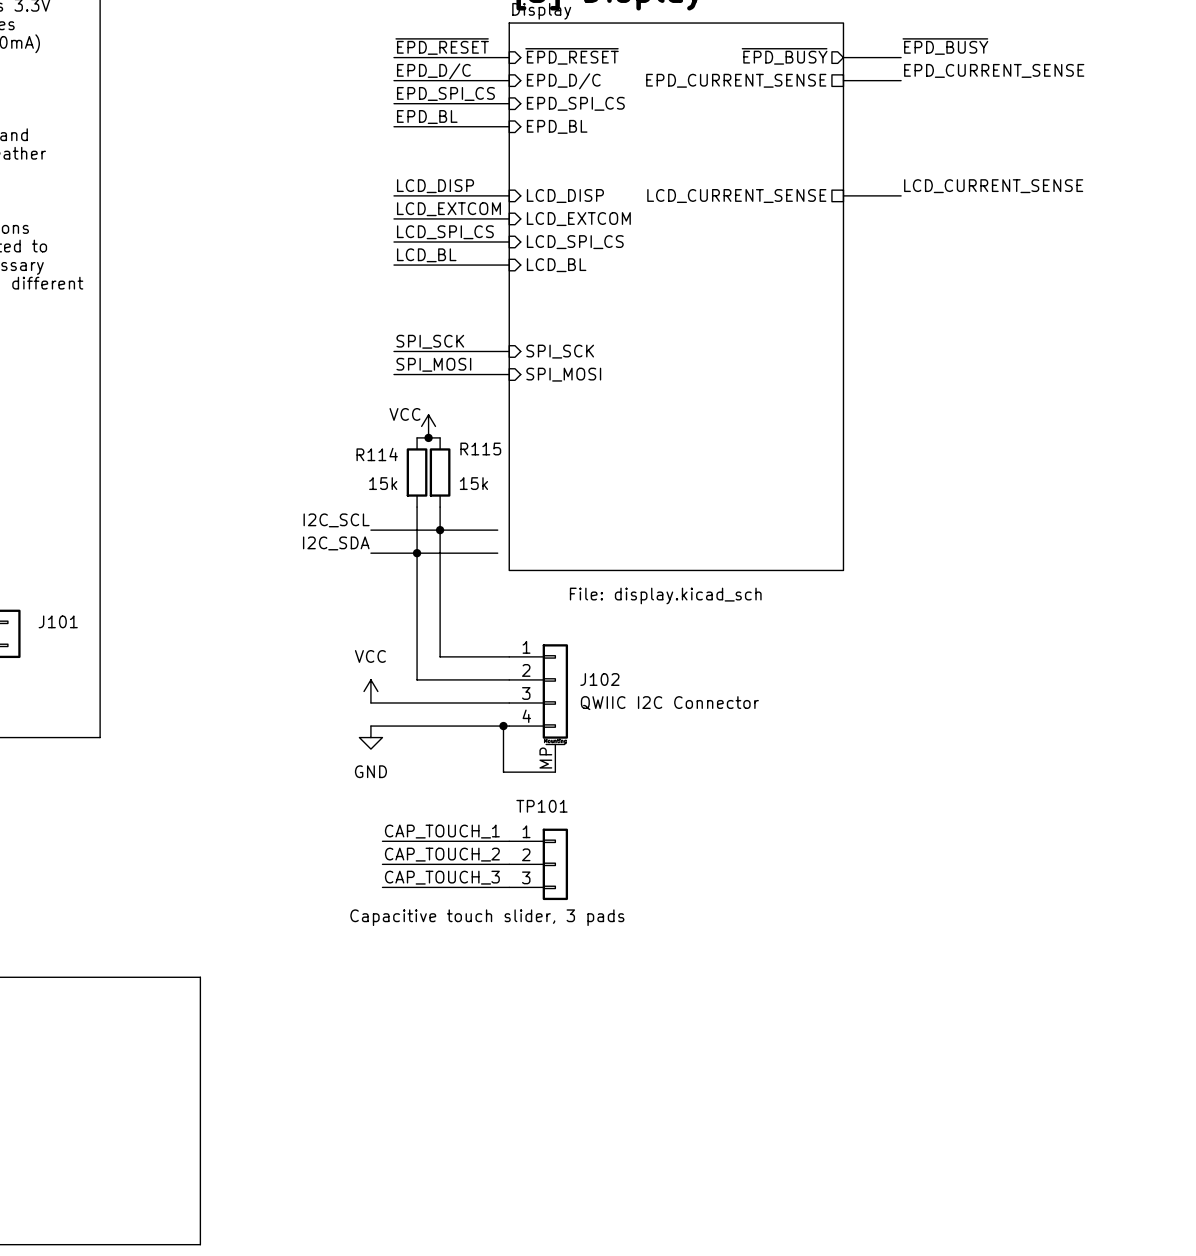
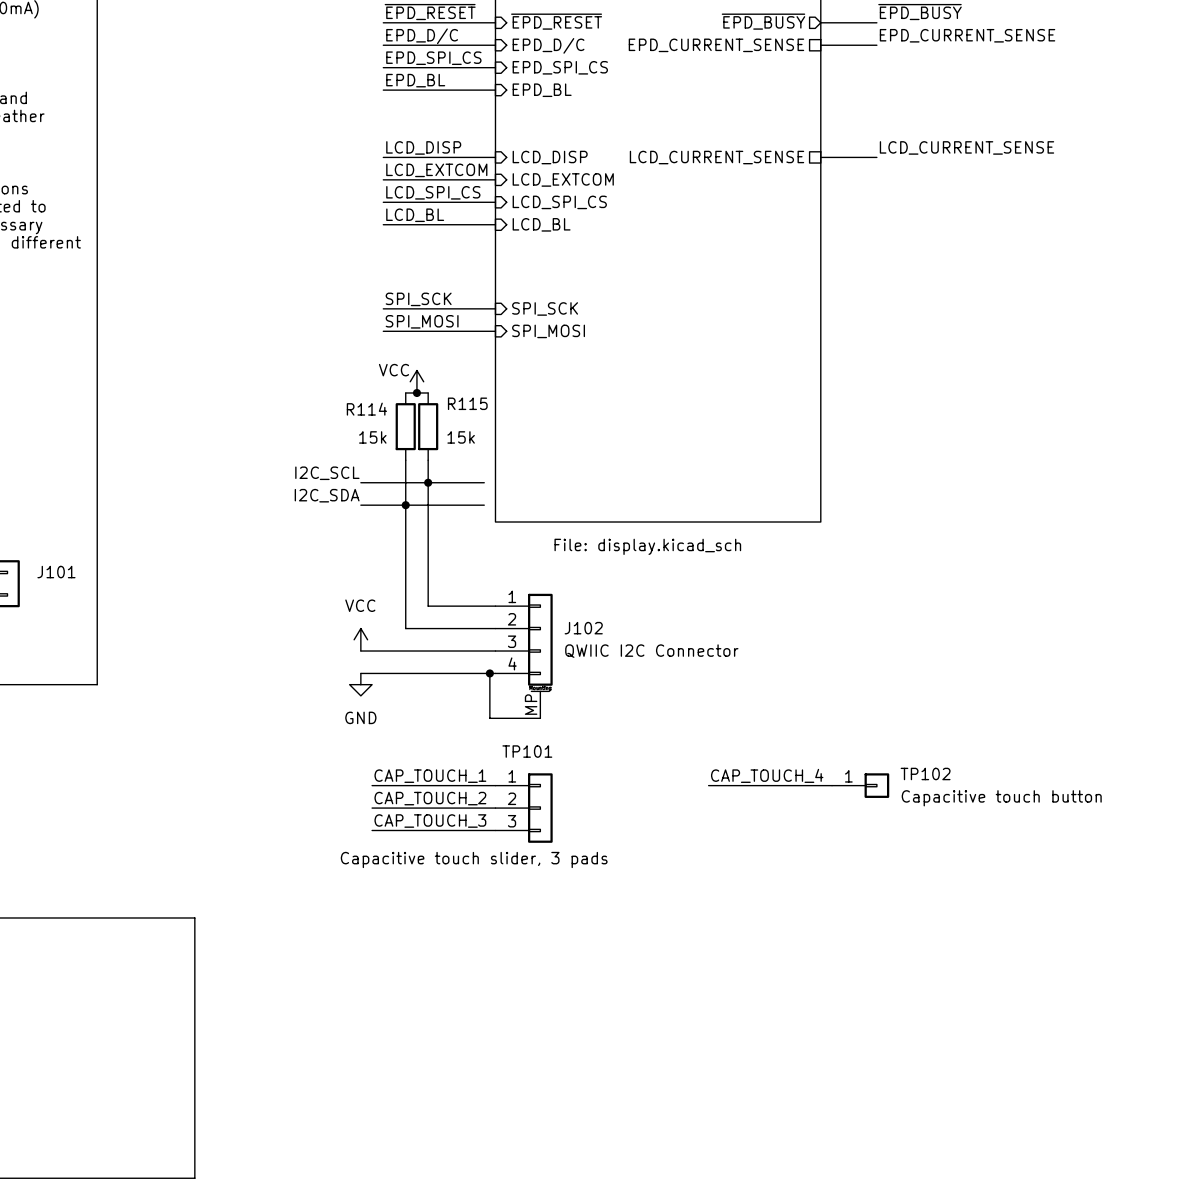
label: none -> CAP_TOUCH_4 (767, 775)
wire: none -> (708, 785) (832, 785)
TP102: none -> Capacitive touch button (860, 785)

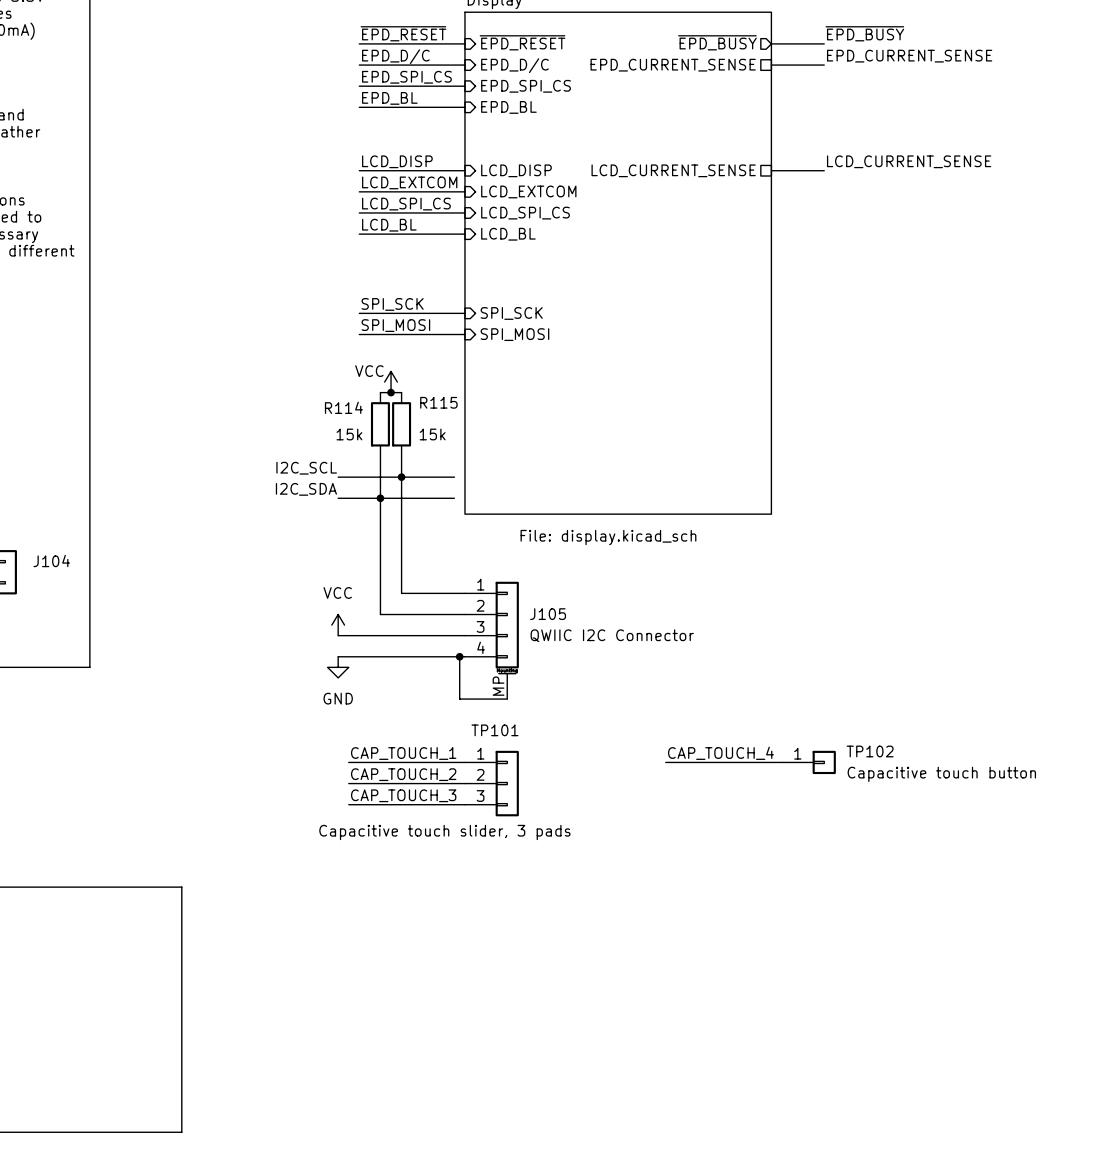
J101 name: J101 (56, 572) -> J104 (51, 561)
J102 name: J102 (583, 628) -> J105 (548, 614)

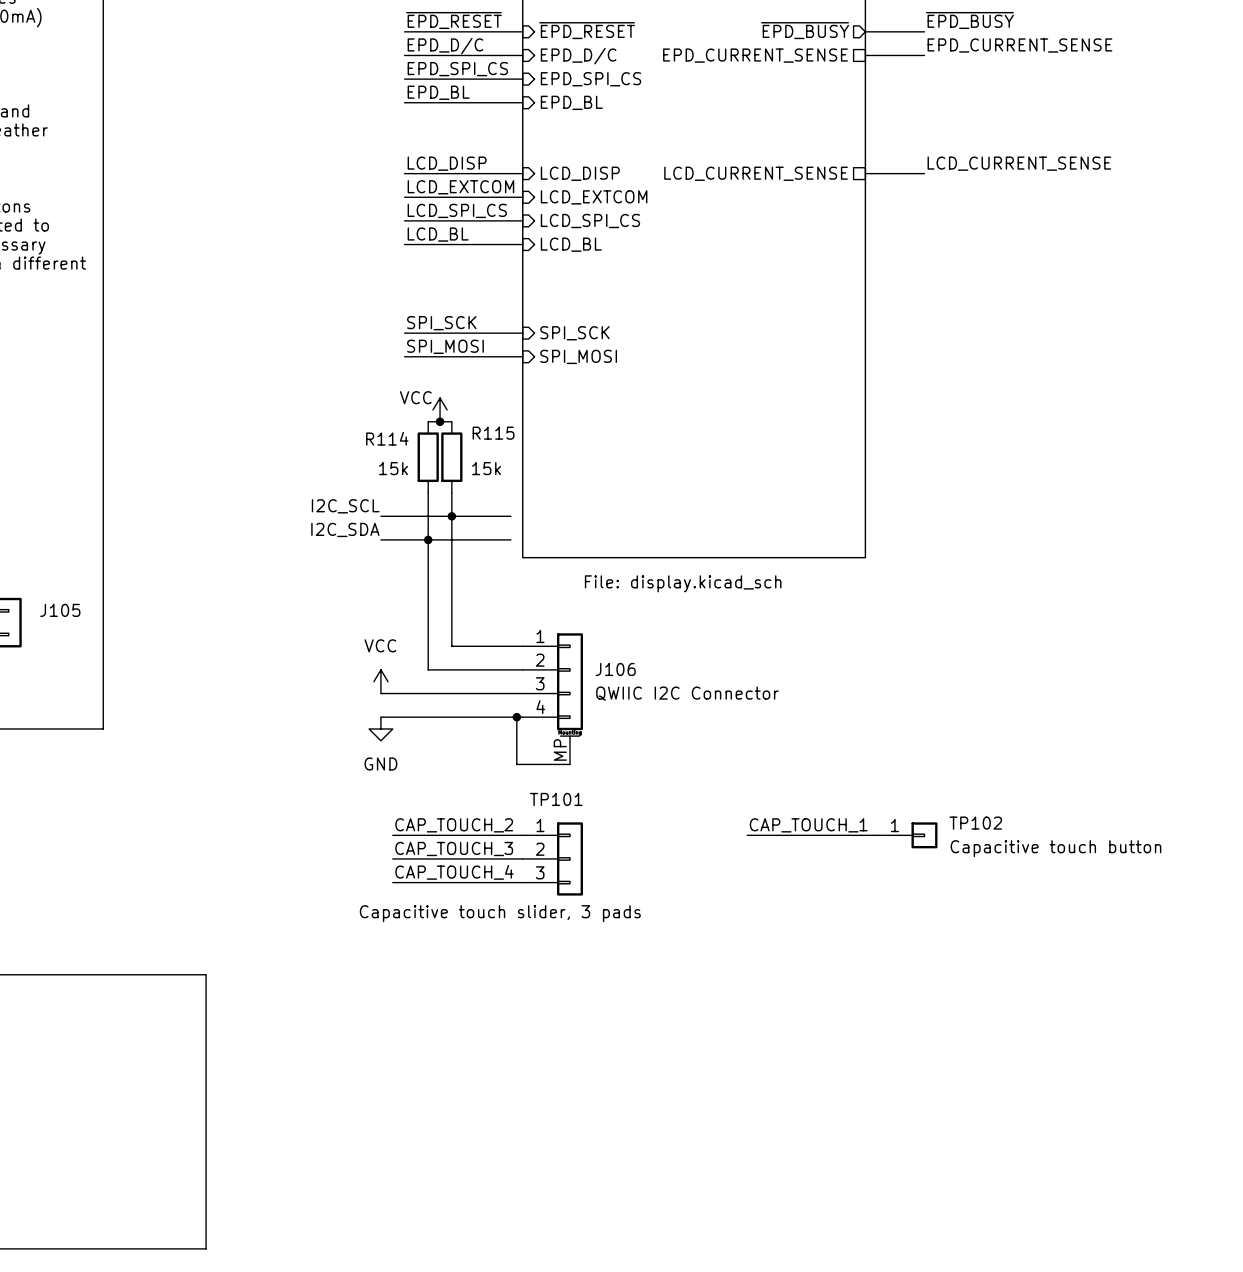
J104 name: J104 (51, 561) -> J105 (60, 610)
J105 name: J105 (548, 614) -> J106 (615, 669)
label: CAP_TOUCH_1 (403, 753) -> CAP_TOUCH_2 (454, 825)
label: CAP_TOUCH_4 (720, 753) -> CAP_TOUCH_1 (808, 825)
label: CAP_TOUCH_2 (403, 774) -> CAP_TOUCH_3 (454, 848)
label: CAP_TOUCH_3 (403, 795) -> CAP_TOUCH_4 (454, 872)

